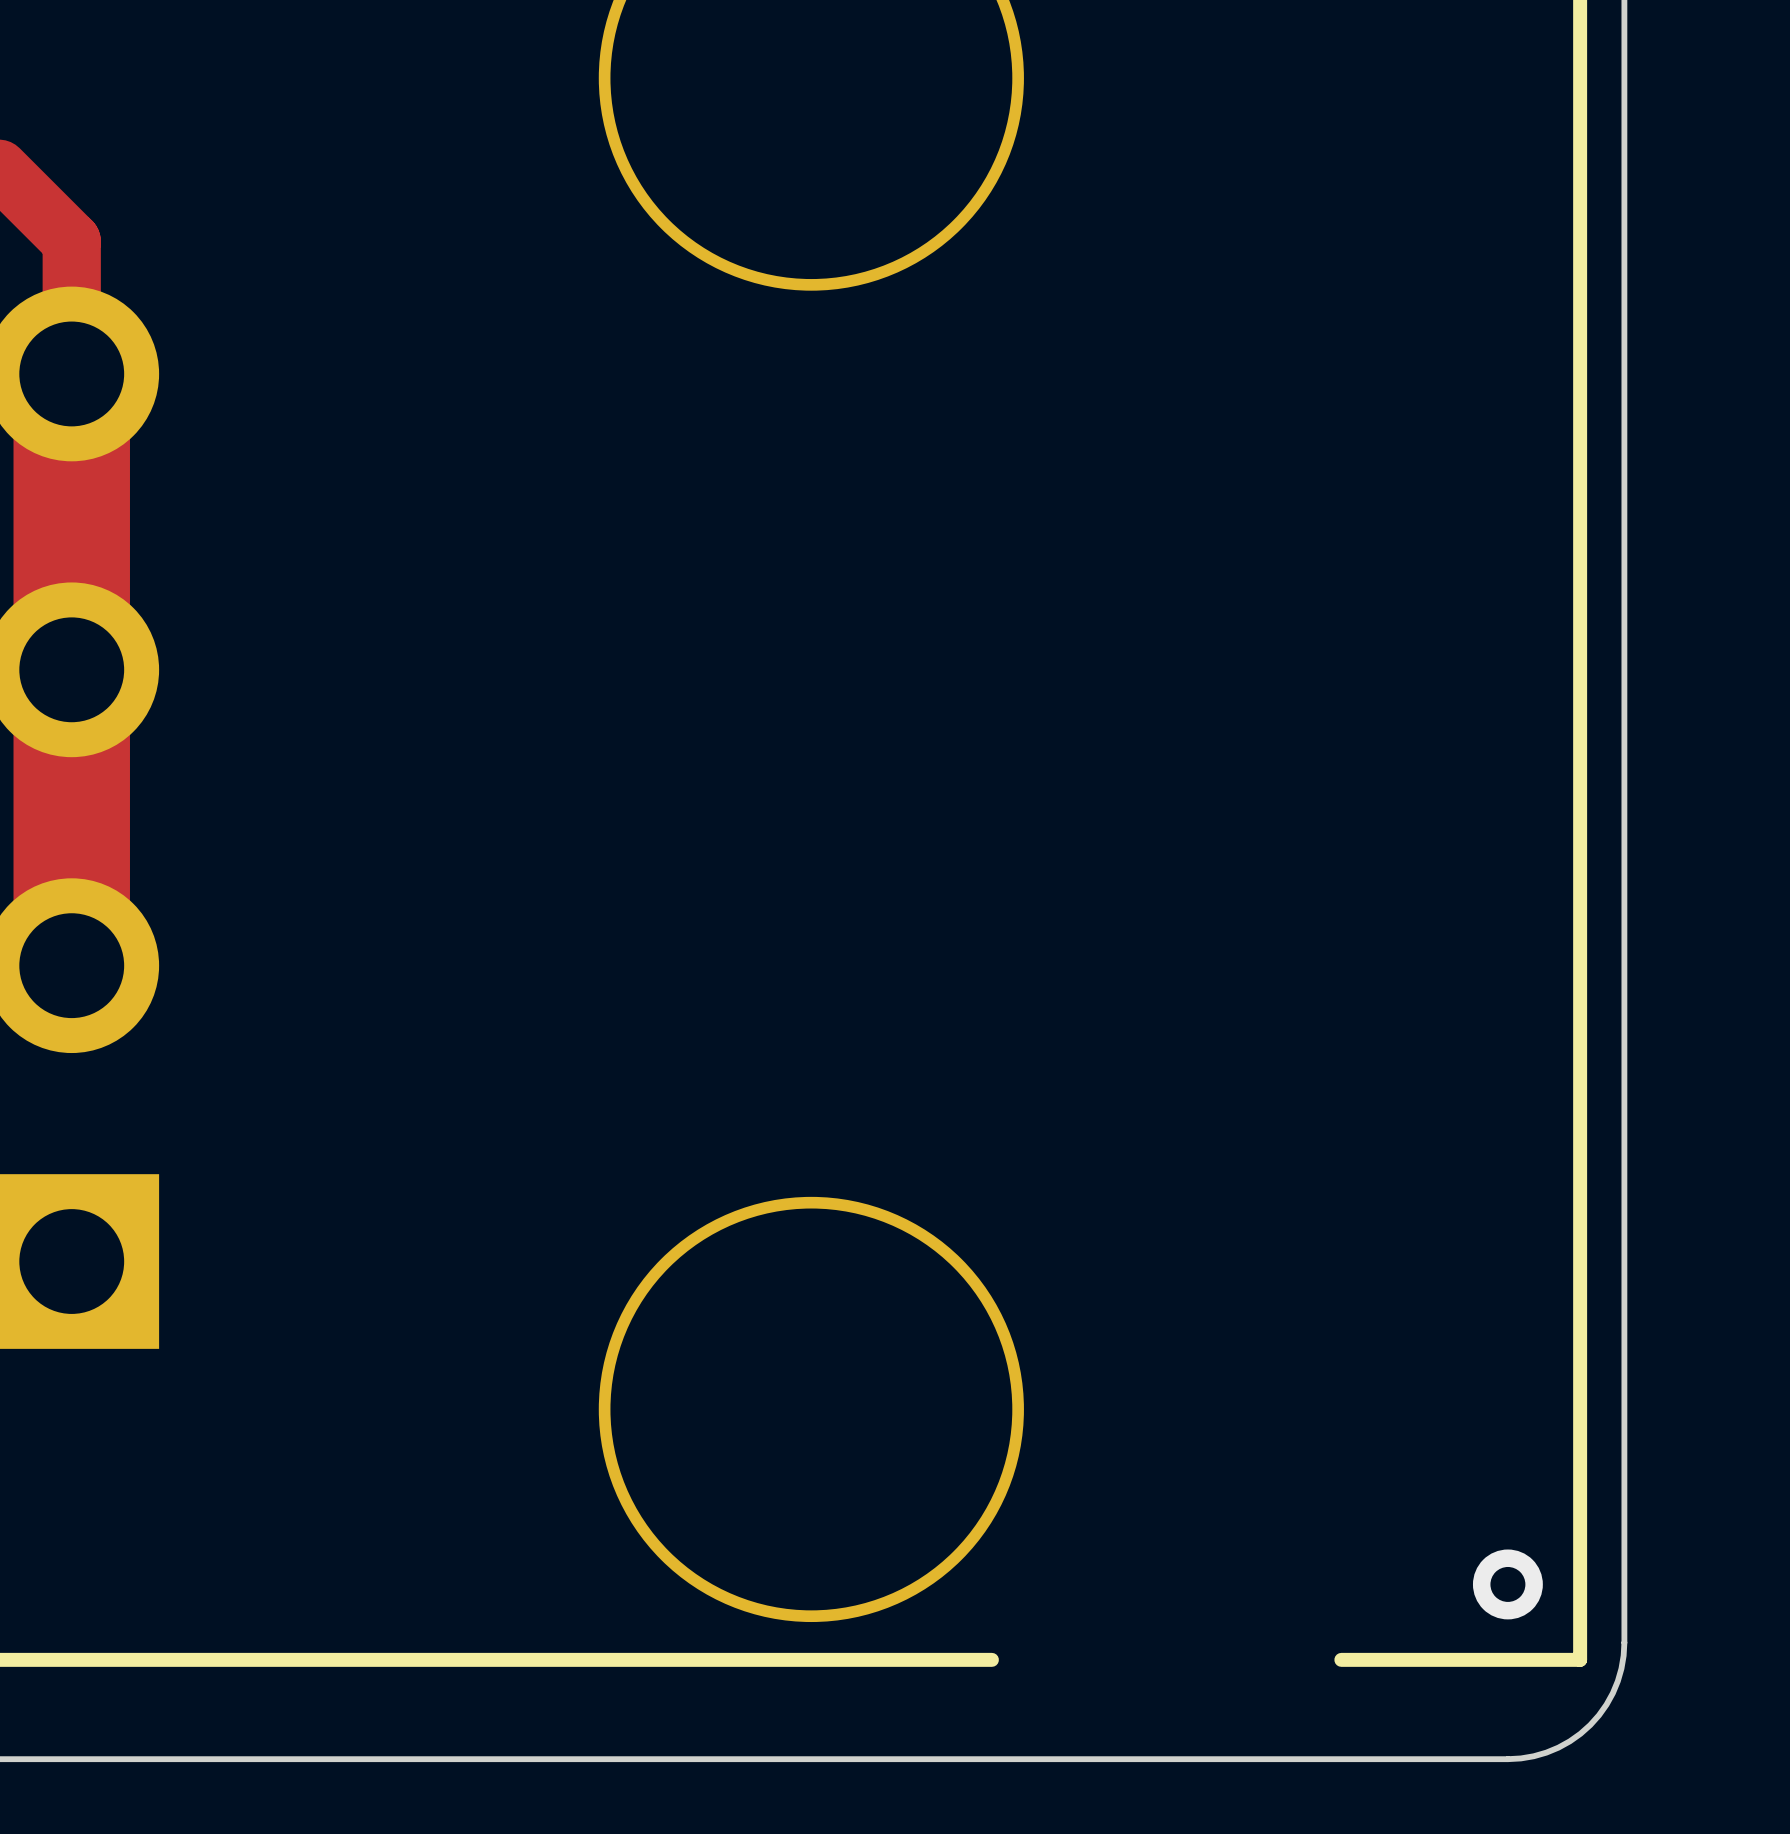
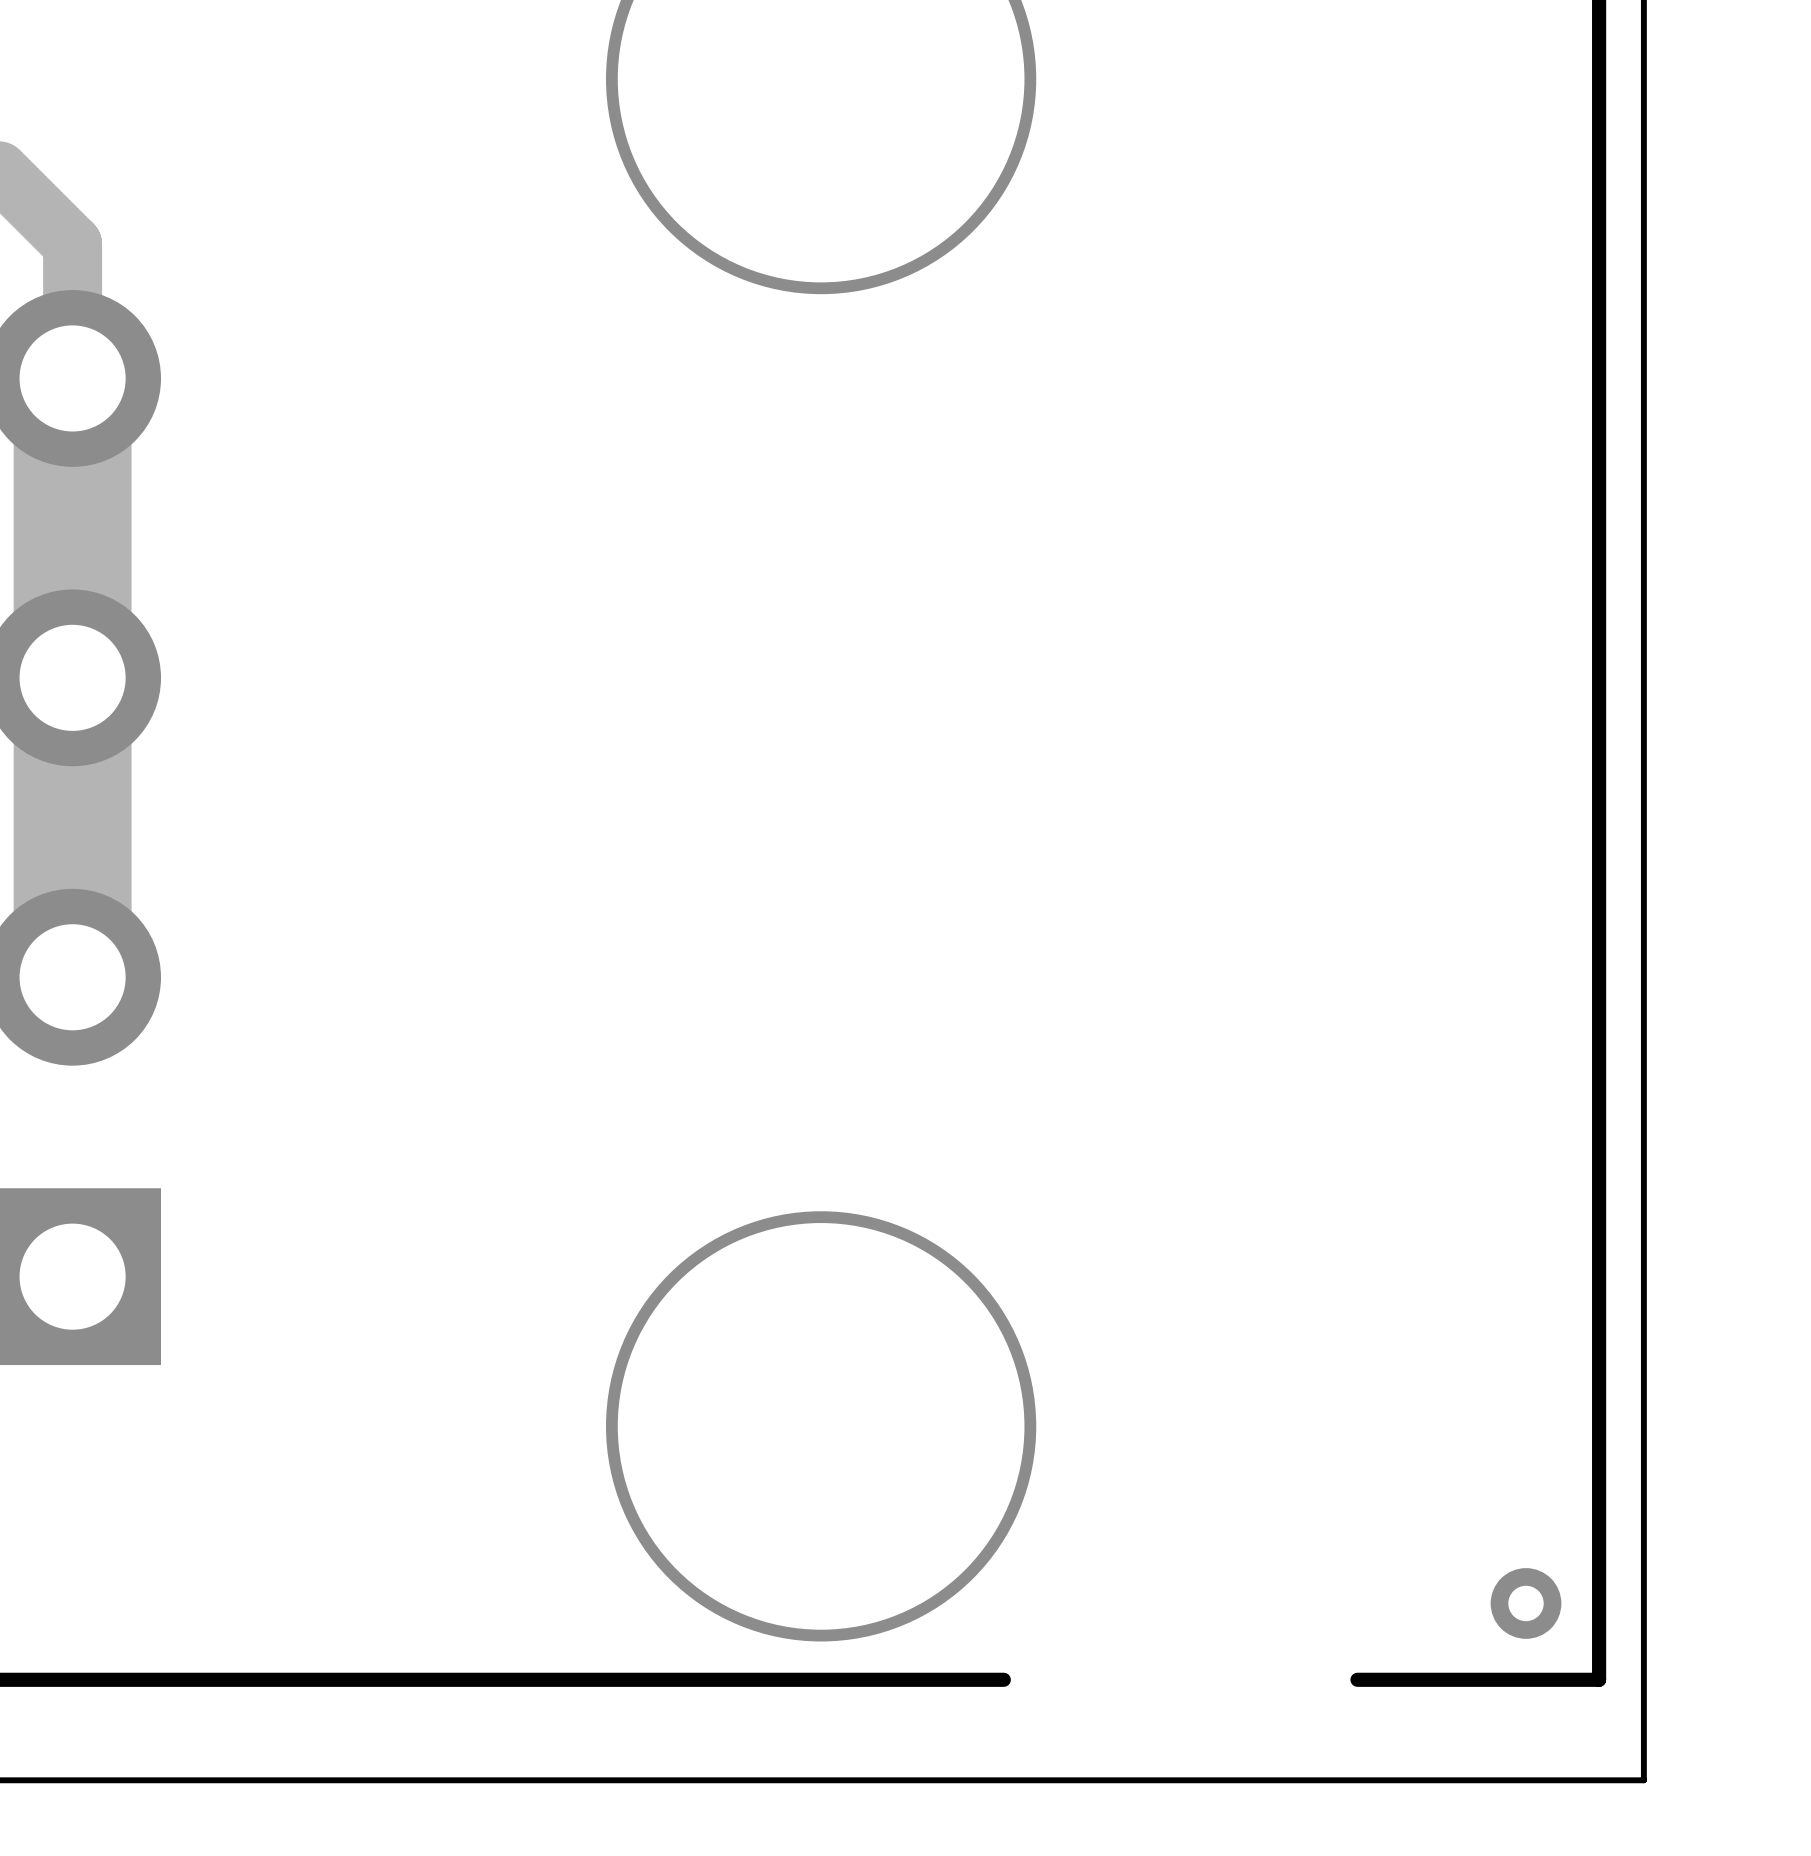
board edge: (1624, 1642) (1621, 1668) (1612, 1693) (1590, 1725) (1558, 1747) (1533, 1756) (1507, 1759) -> (1643, 1662) (1643, 1780) (1526, 1780)

